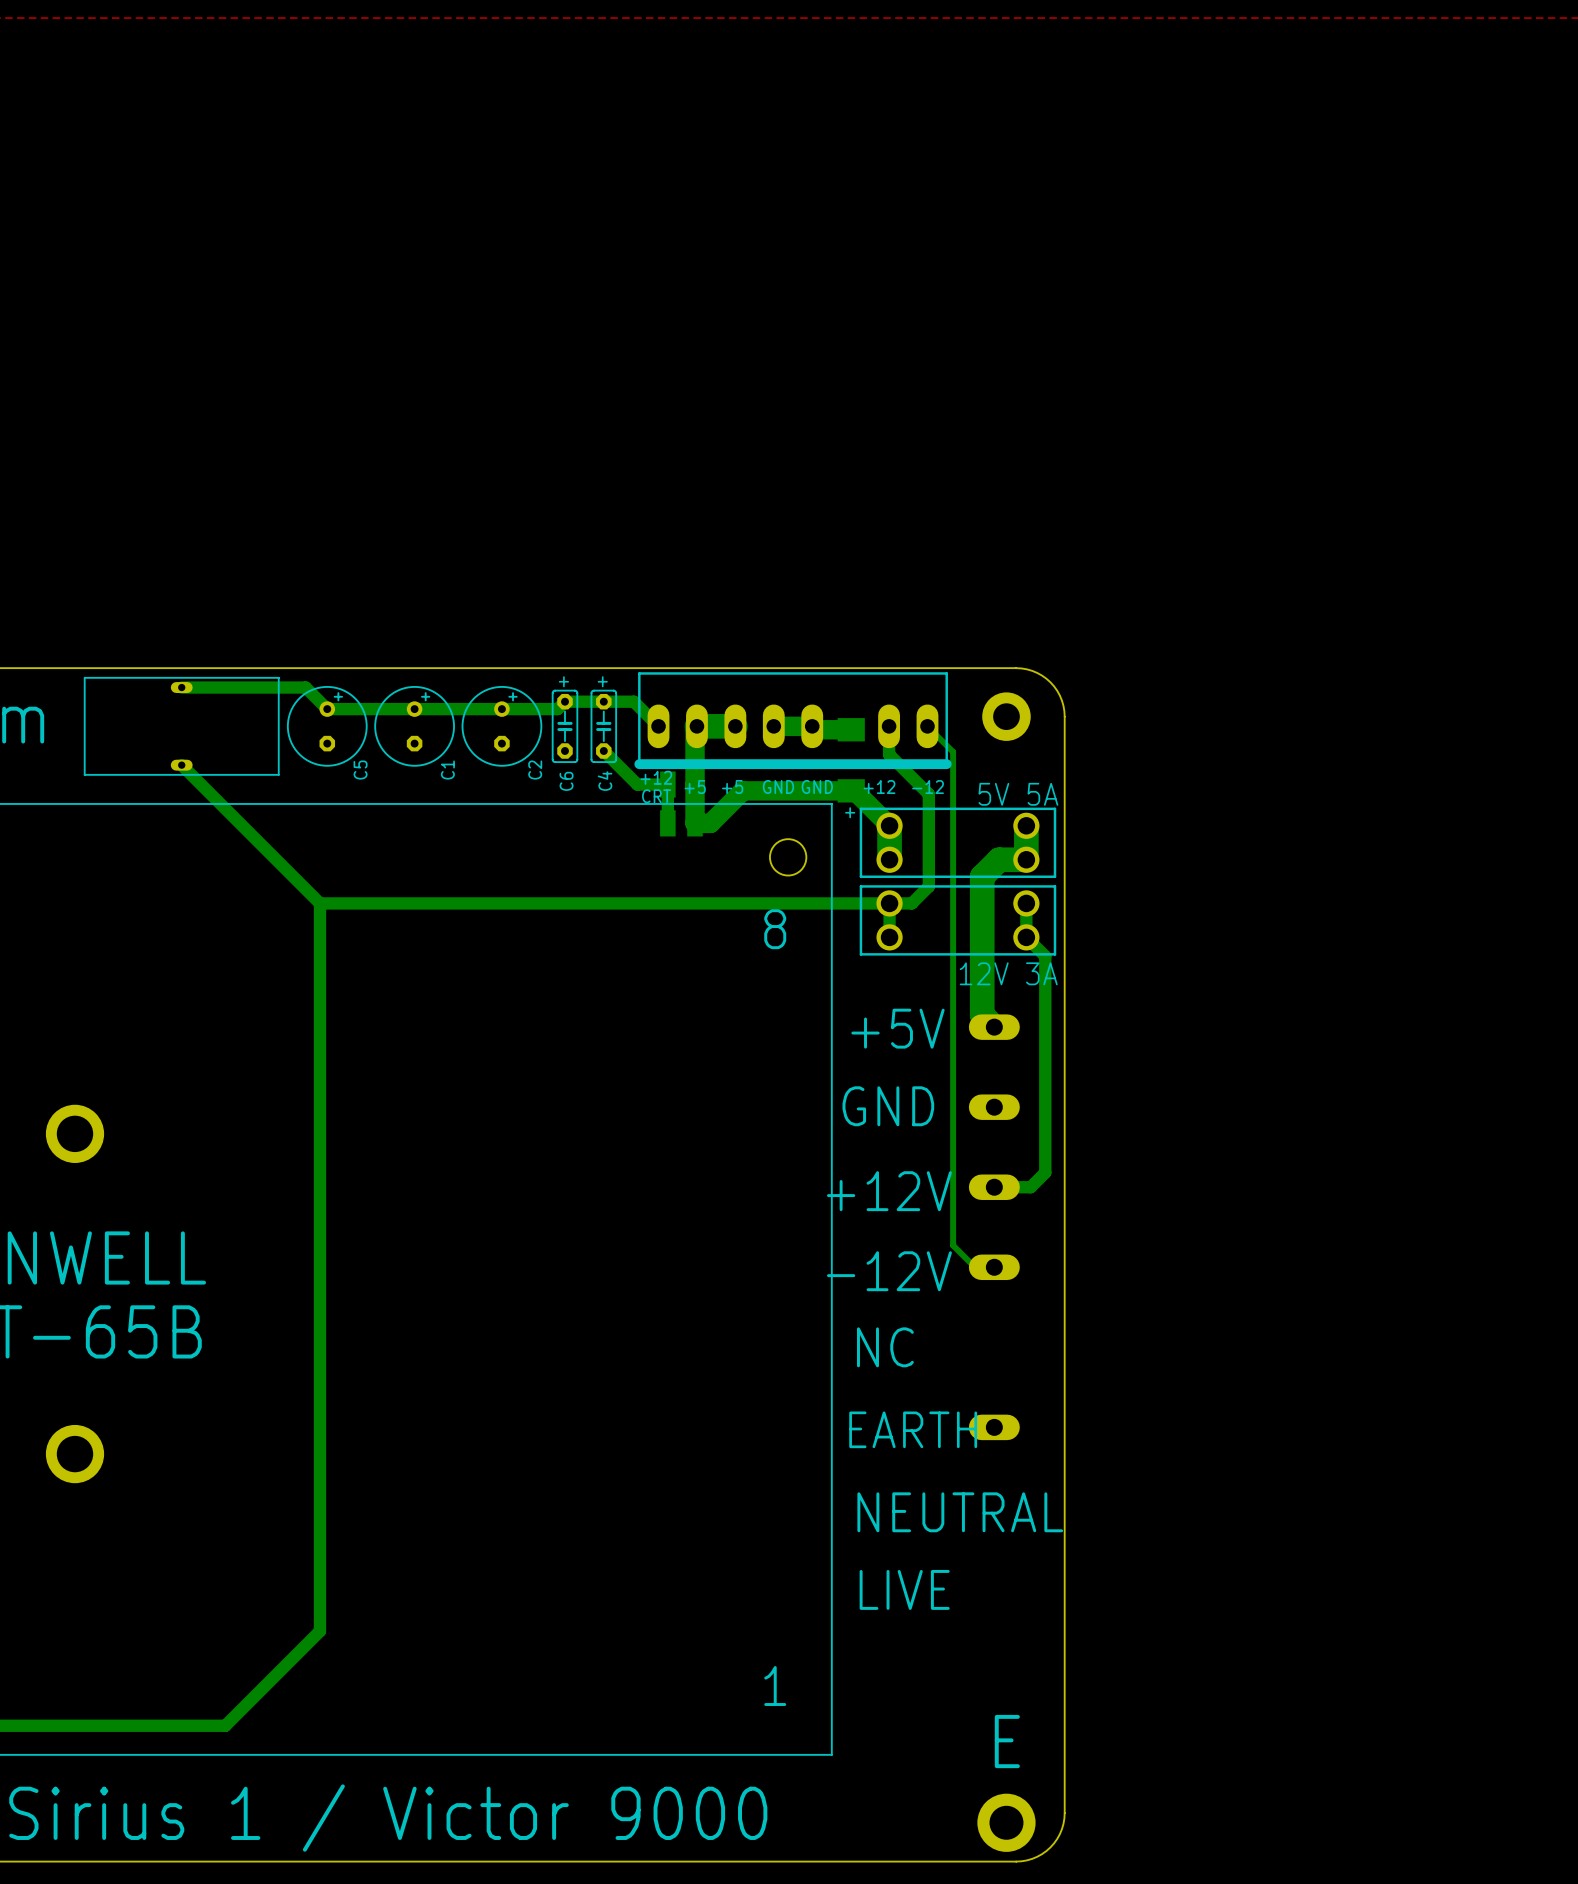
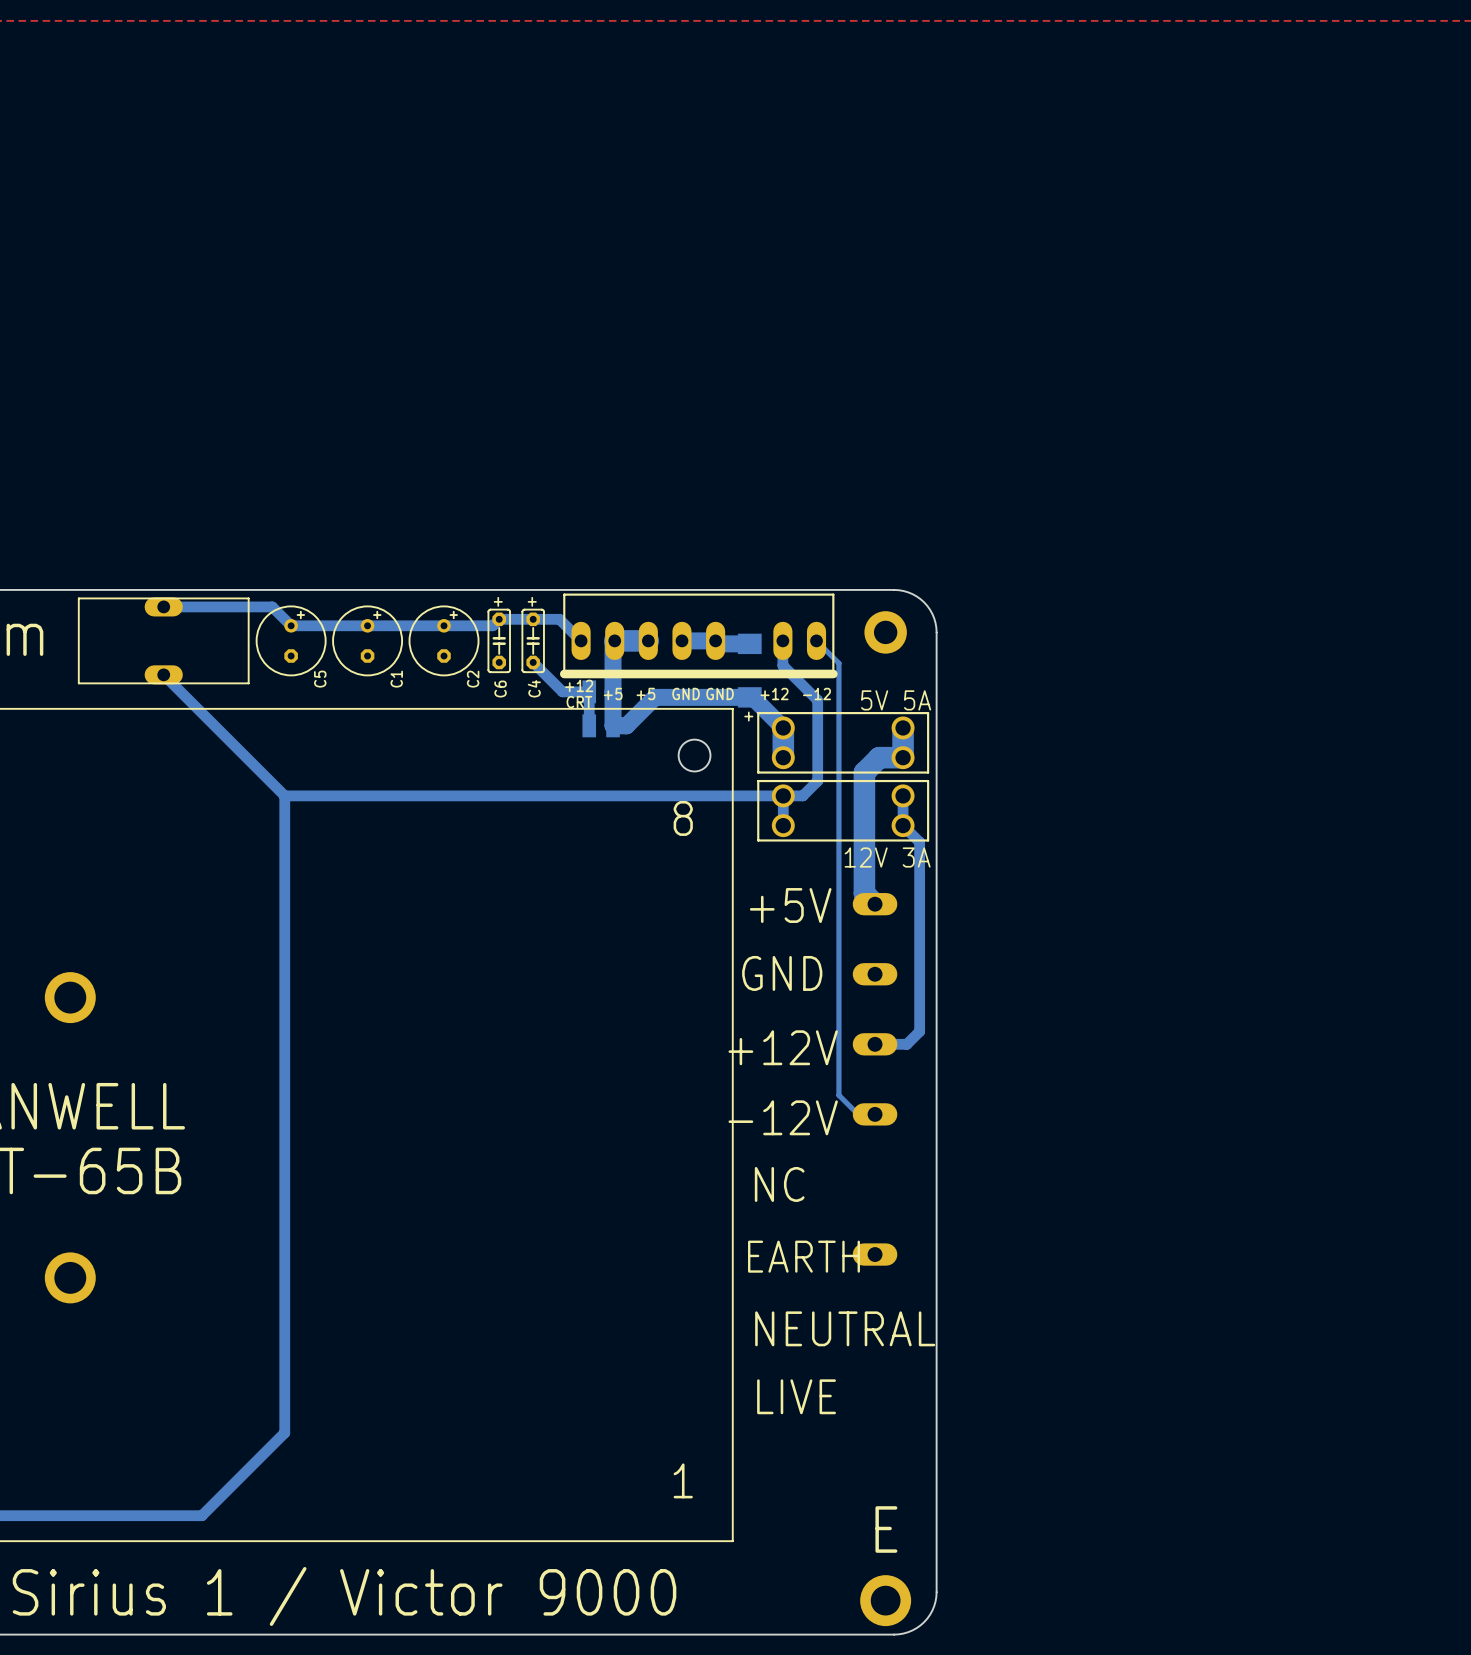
part footprint: [83, 677, 280, 776] -> [78, 597, 250, 685]

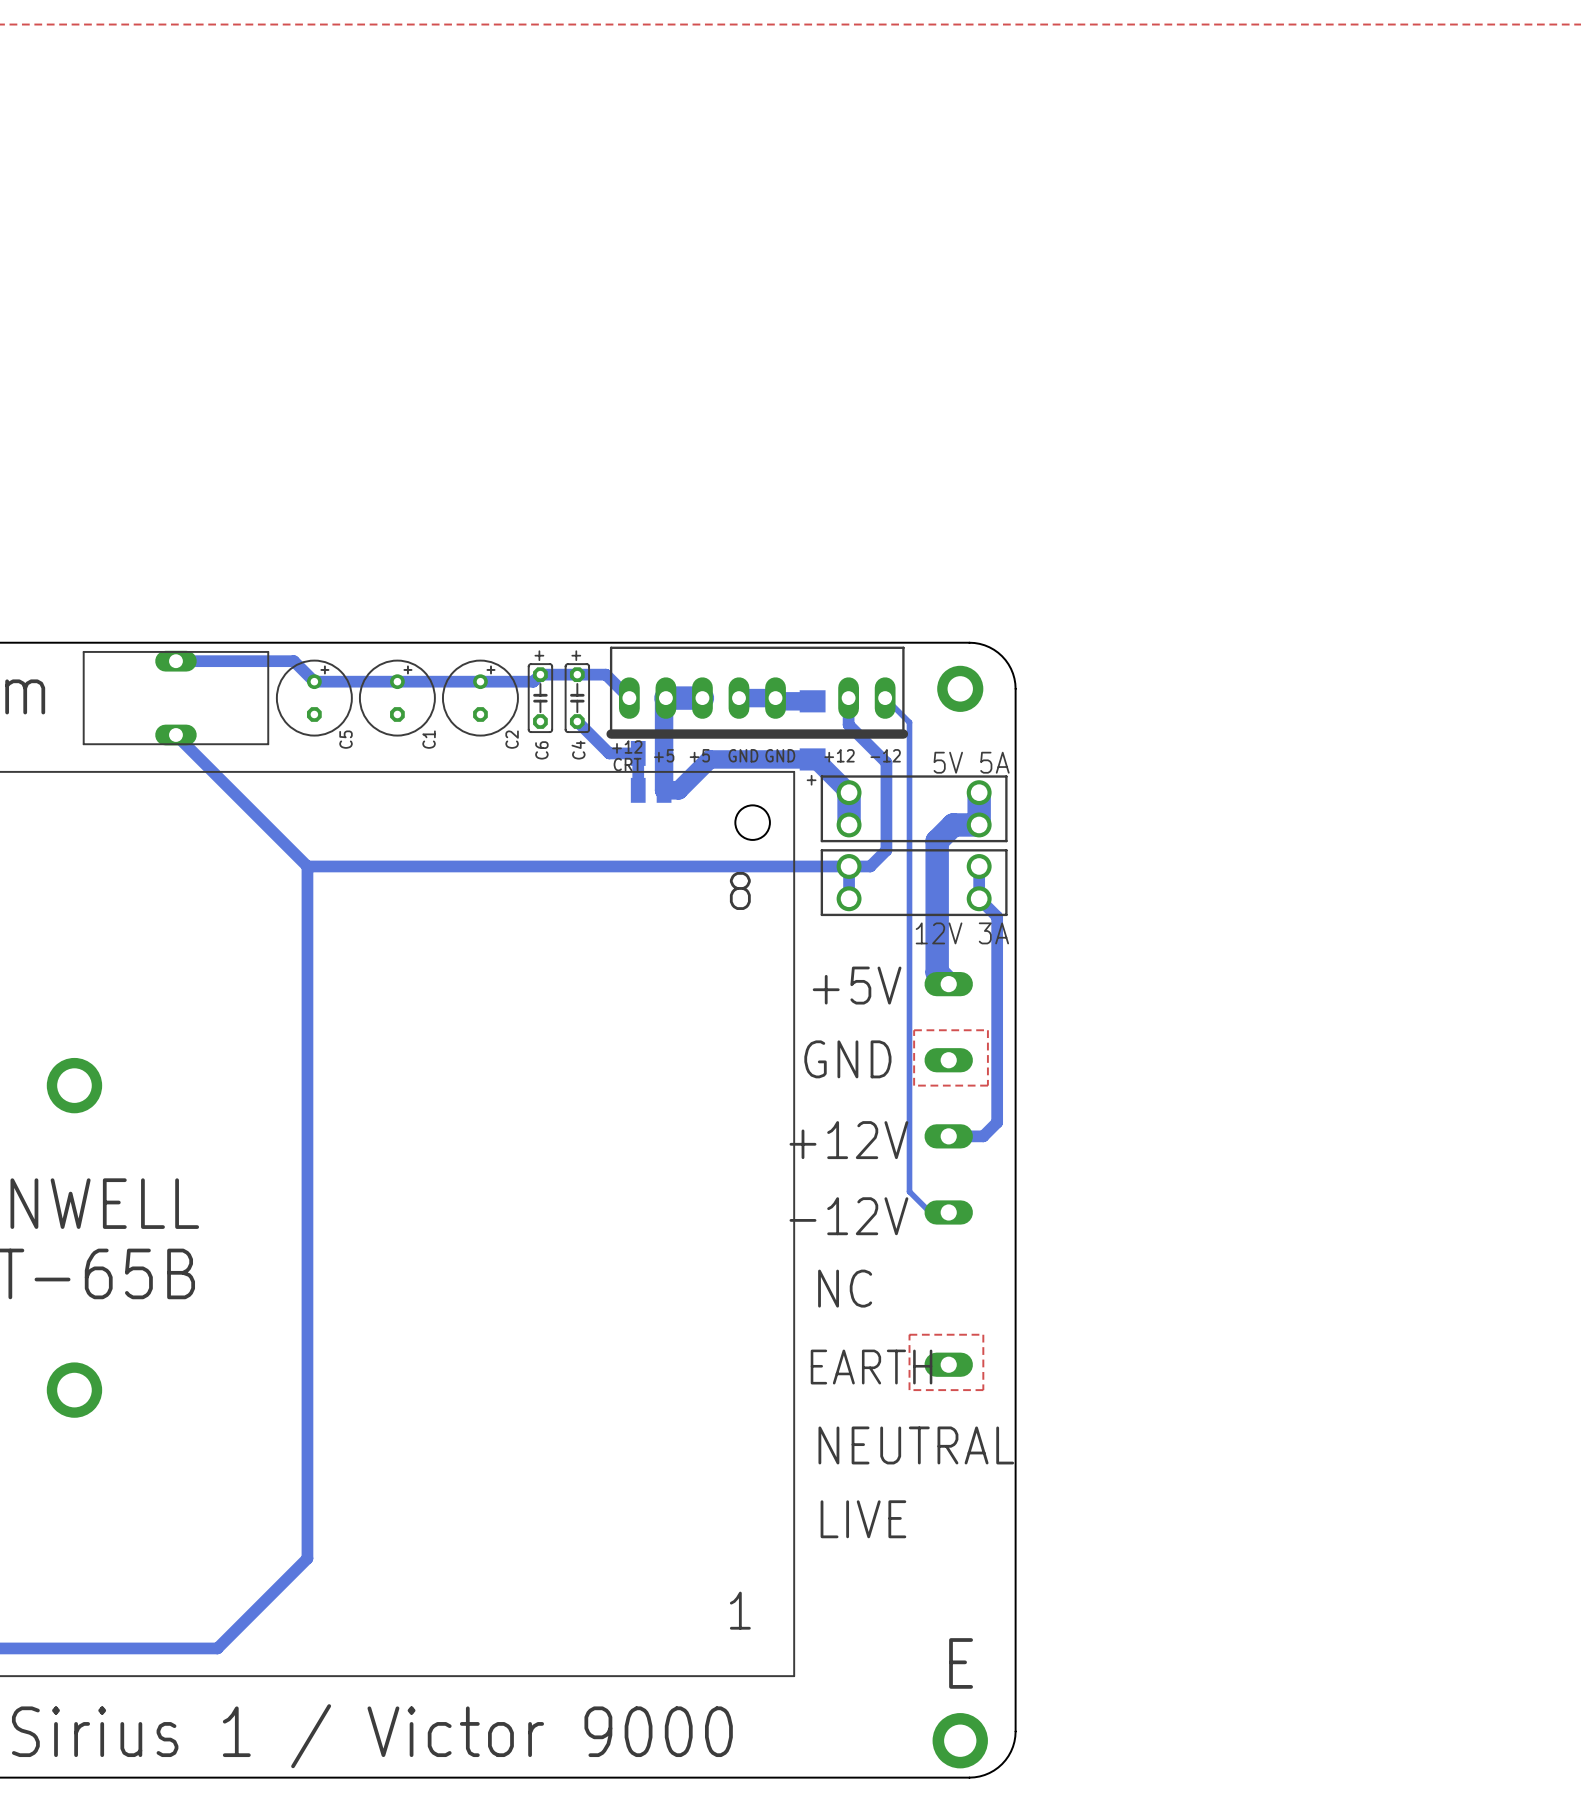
top zone outline: none -> (914, 1030) (987, 1030) (987, 1085) (914, 1085) (914, 1030)
top zone outline: none -> (909, 1334) (983, 1334) (983, 1390) (909, 1390) (909, 1334)

